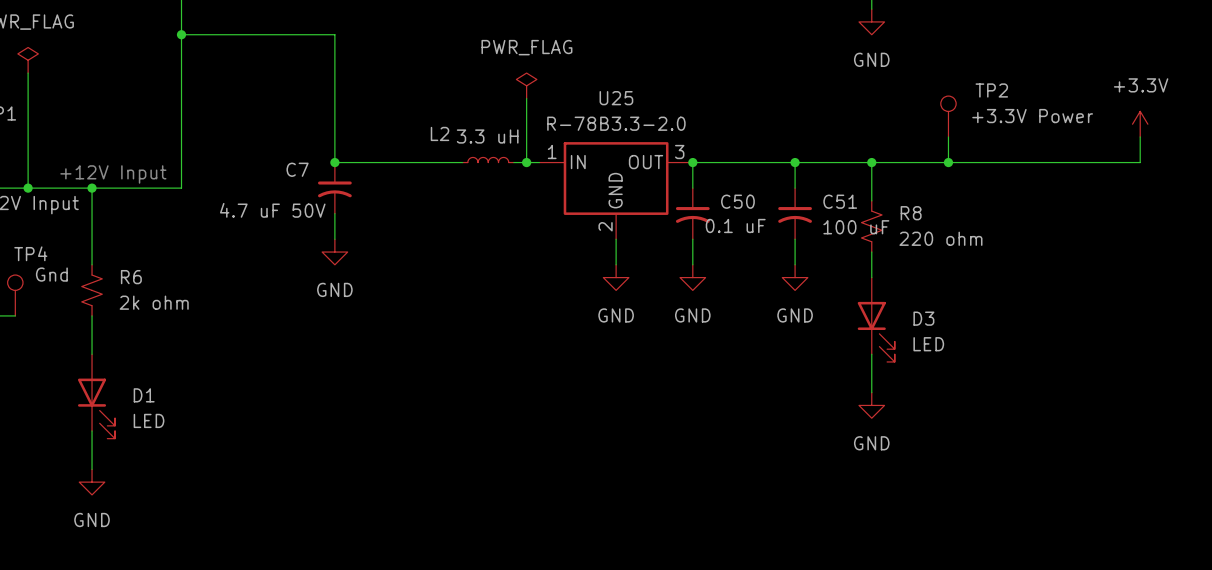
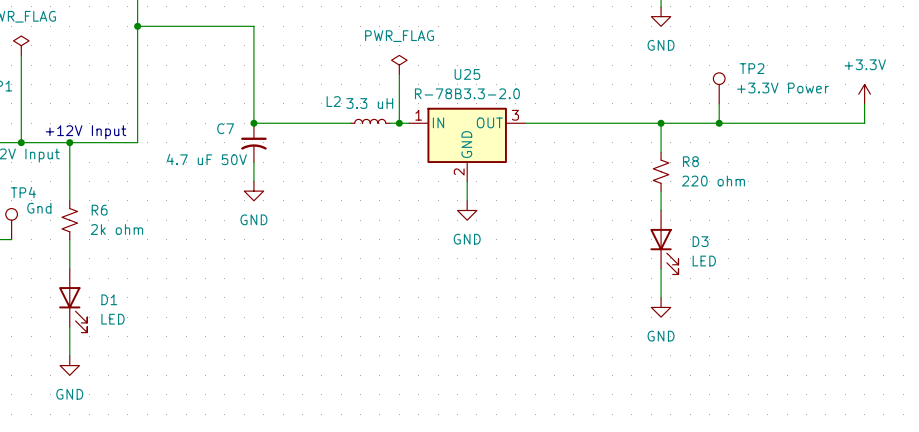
wire: (692, 162) (692, 188) -> none
junction: (692, 162) -> none
wire: (795, 162) (795, 188) -> none
junction: (795, 162) -> none
C50: 0.1 uF (692, 213) -> none
C51: 100 uF (795, 213) -> none
wire: (692, 239) (692, 264) -> none
wire: (795, 239) (795, 264) -> none
power symbol: GND (692, 277) -> none
power symbol: GND (795, 277) -> none

